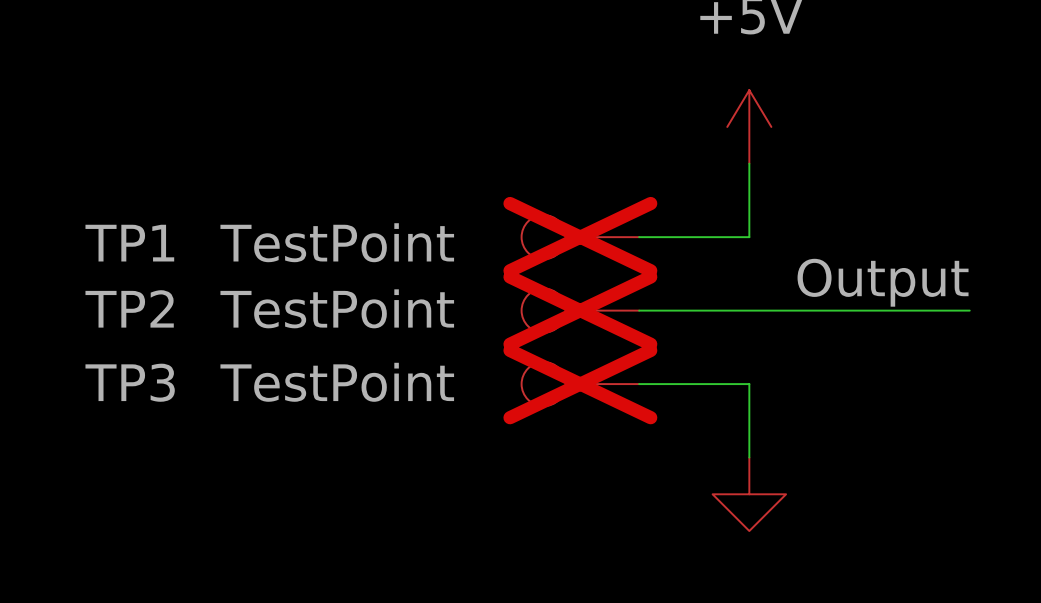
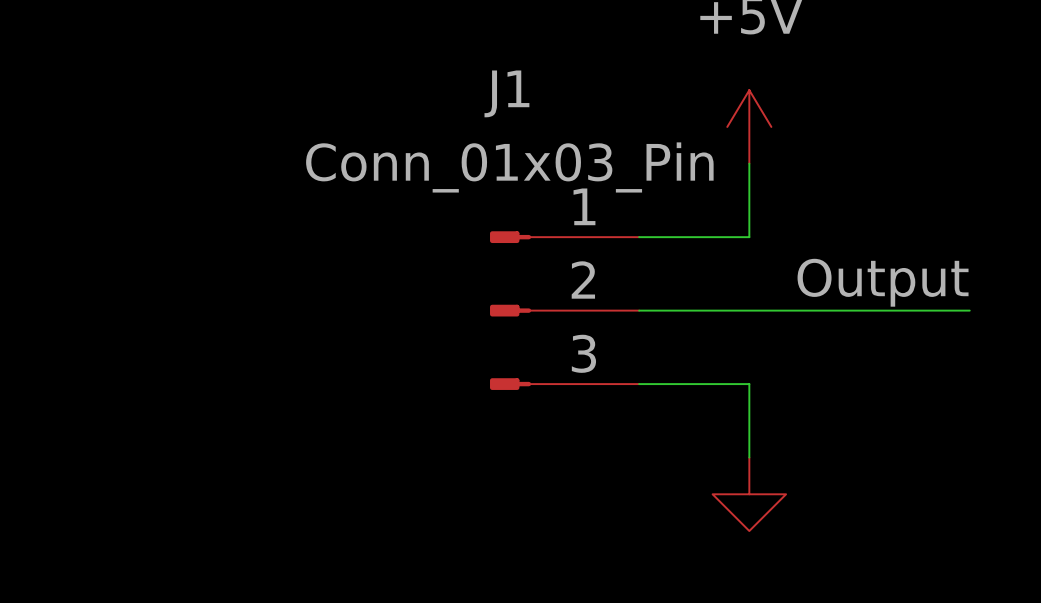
TP1: TestPoint (580, 237) -> none
J1: none -> Conn_01x03_Pin (564, 310)
TP2: TestPoint (580, 310) -> none
TP3: TestPoint (580, 384) -> none

